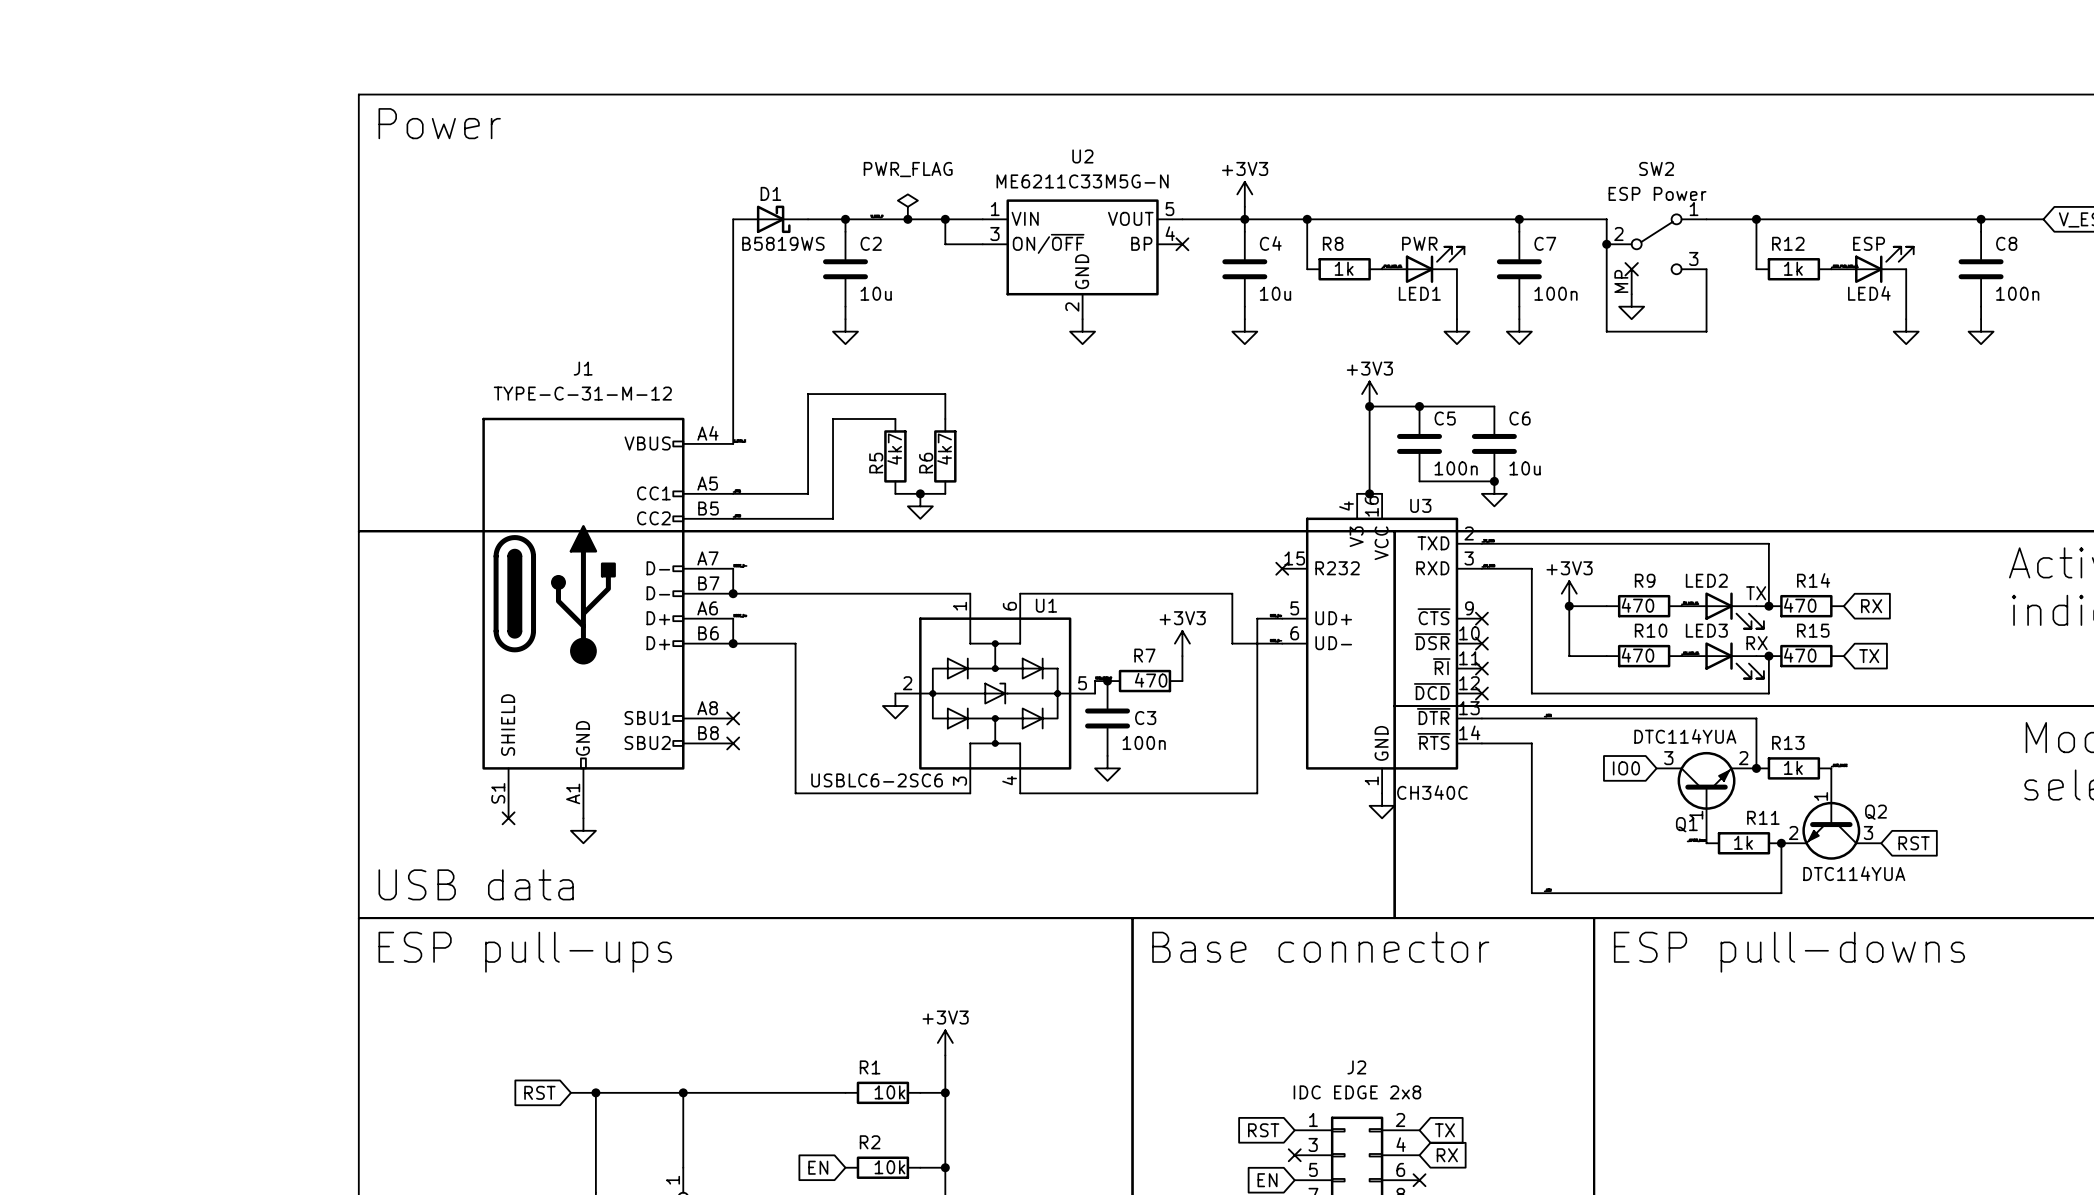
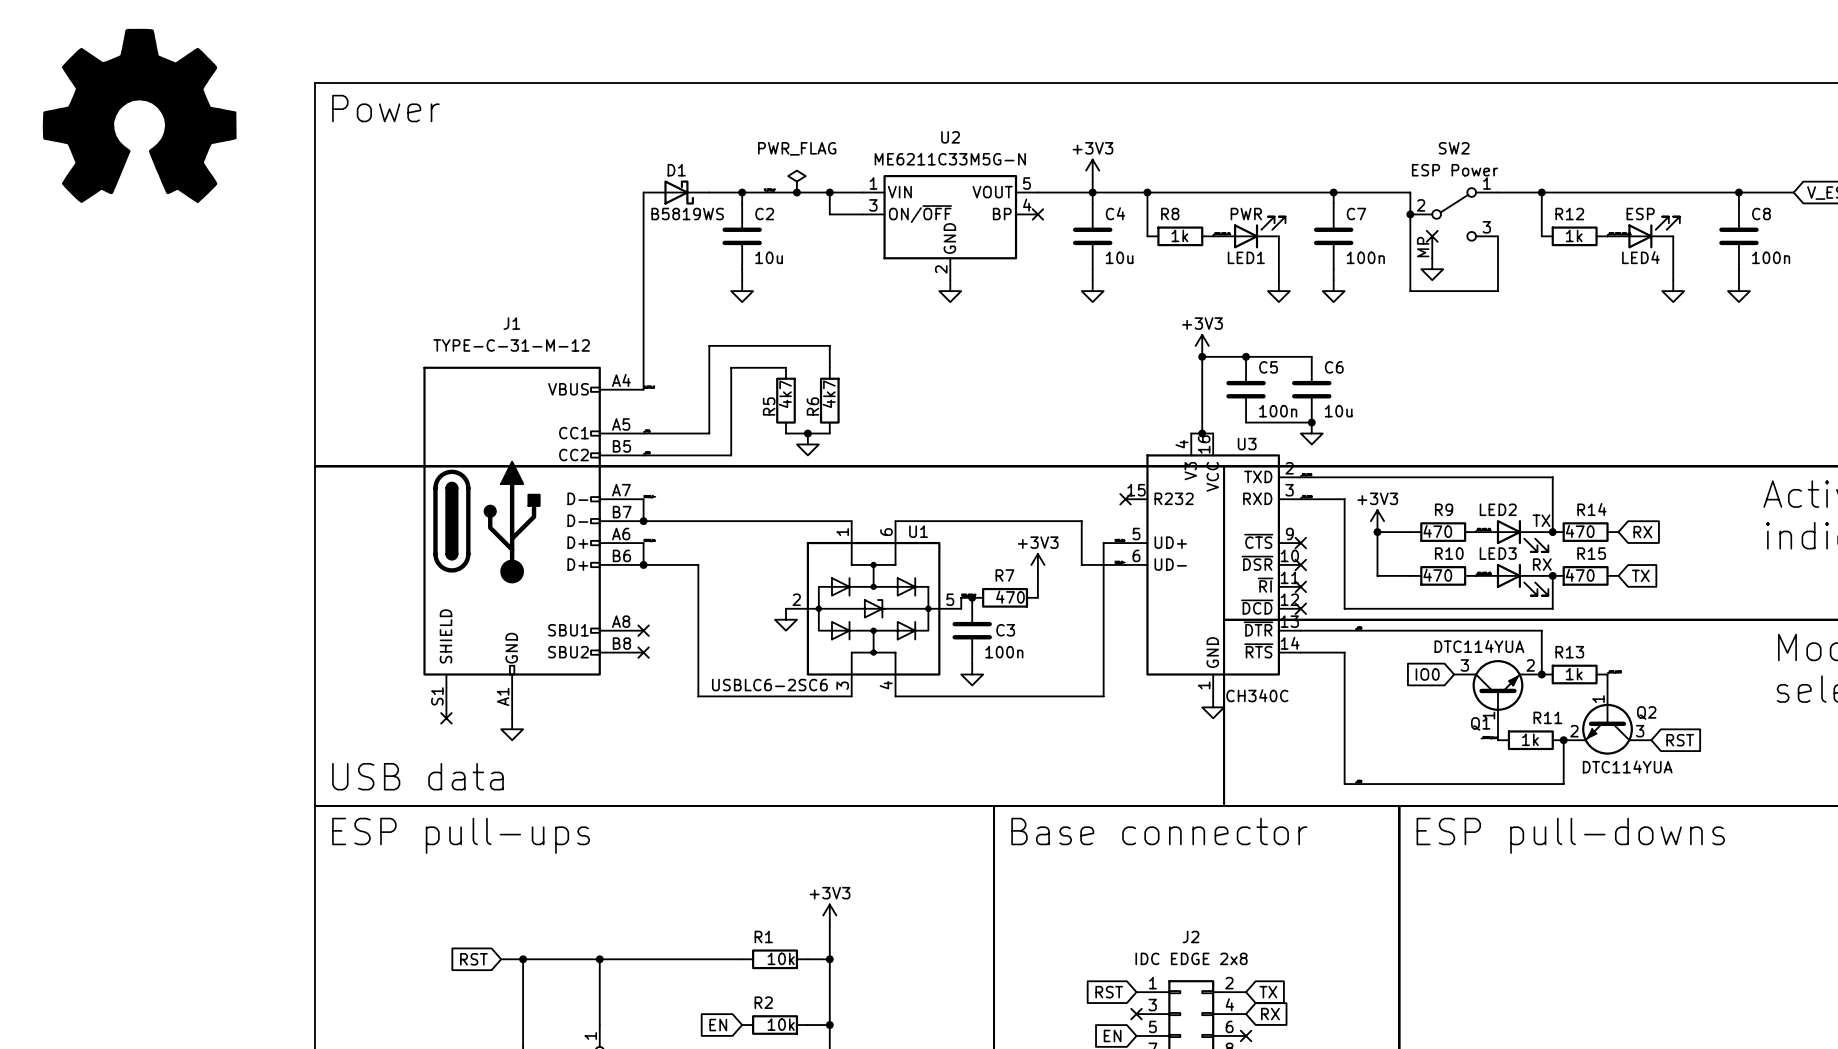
part: none -> (139, 115)

